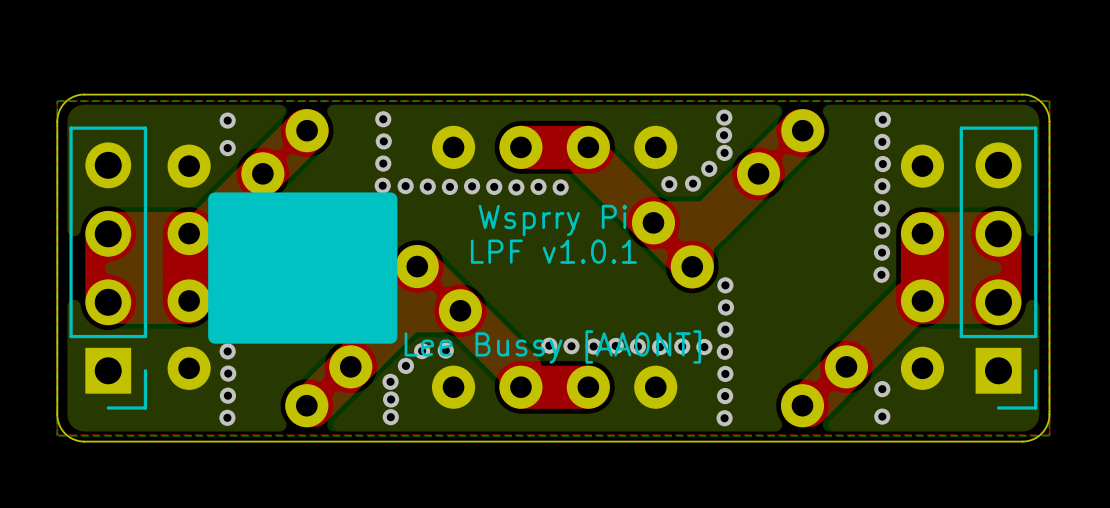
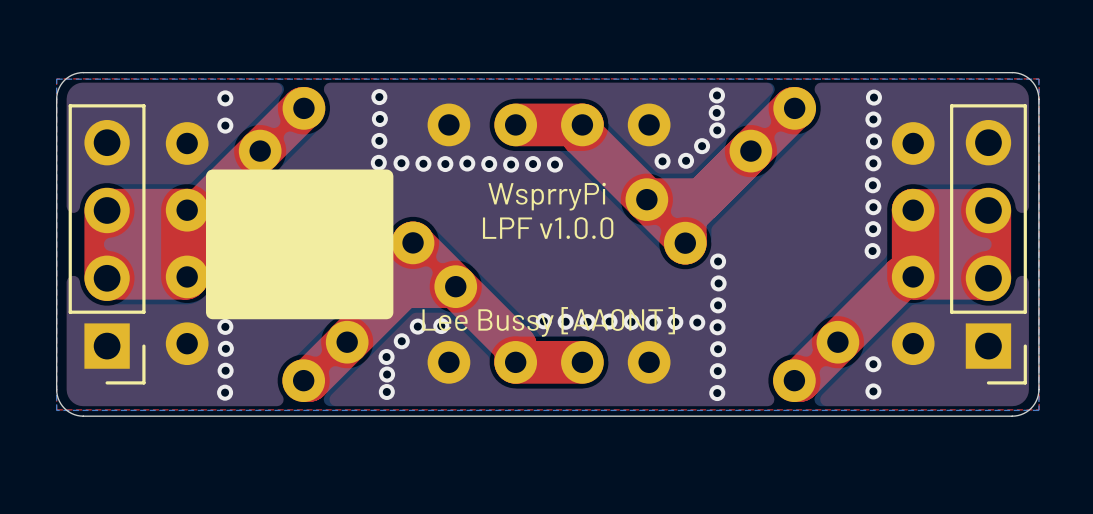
text: Wsprry Pi (552, 220) -> WsprryPi (547, 196)
text: LPF v1.0.1 (553, 251) -> LPF v1.0.0 (548, 228)

